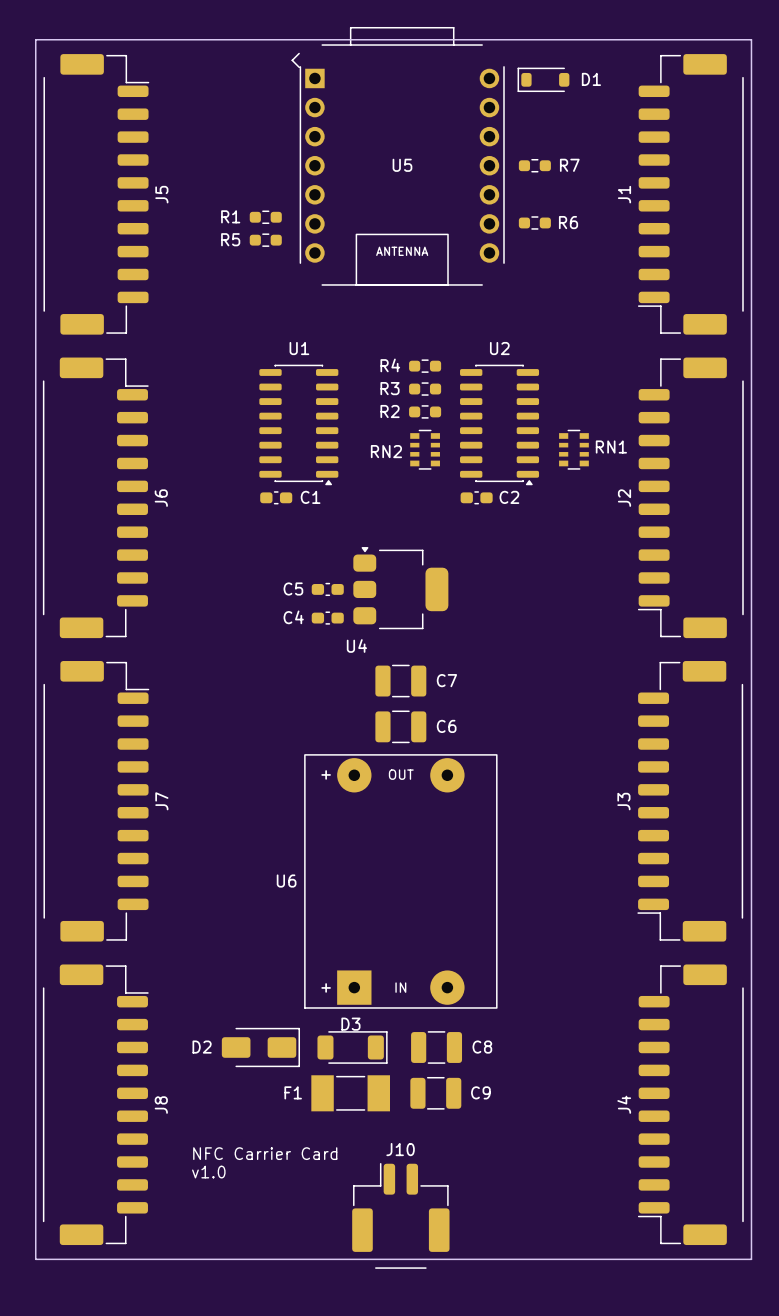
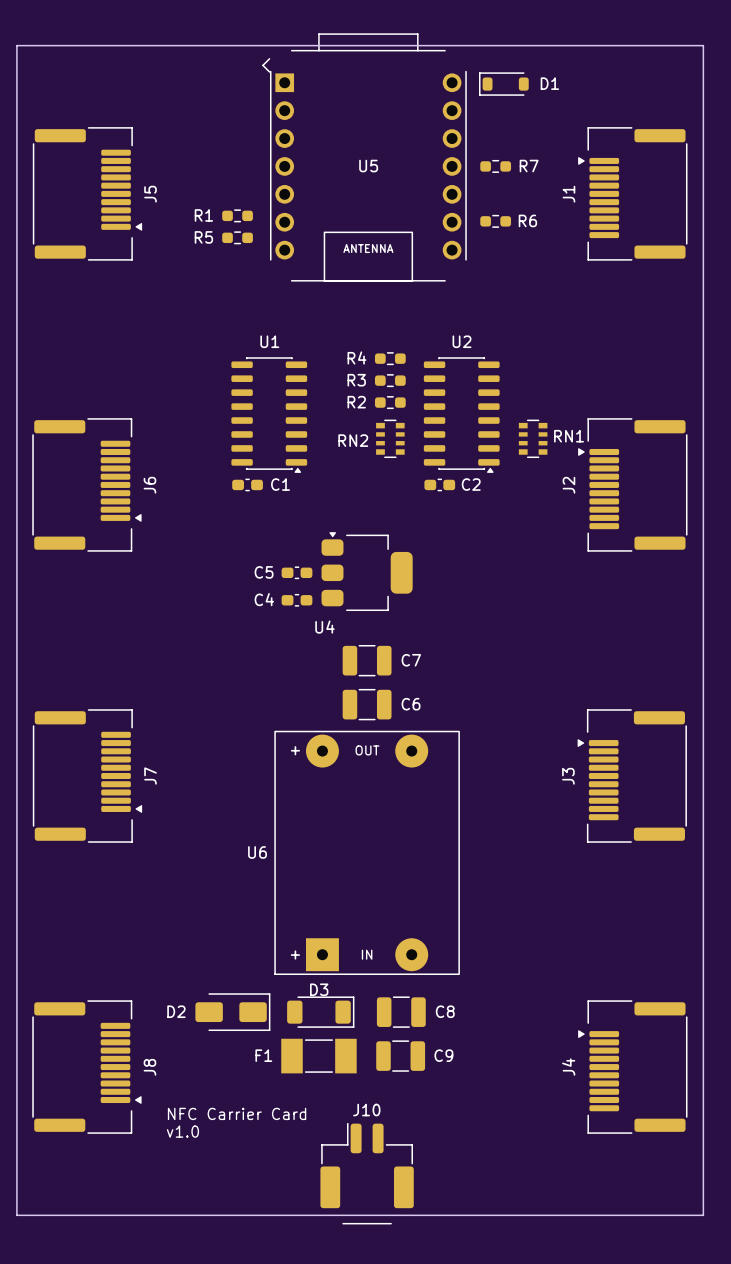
J5 footprint: [43, 54, 150, 335] -> [32, 127, 143, 261]
J1 footprint: [637, 54, 744, 335] -> [578, 127, 688, 261]
J6 footprint: [42, 357, 149, 639] -> [32, 418, 142, 552]
J2 footprint: [637, 357, 744, 639] -> [578, 418, 688, 552]
J7 footprint: [43, 661, 150, 942] -> [32, 709, 143, 843]
J3 footprint: [637, 661, 744, 942] -> [577, 709, 687, 843]
J8 footprint: [42, 964, 149, 1246] -> [32, 1000, 142, 1134]
J4 footprint: [637, 964, 744, 1246] -> [578, 1000, 688, 1134]

